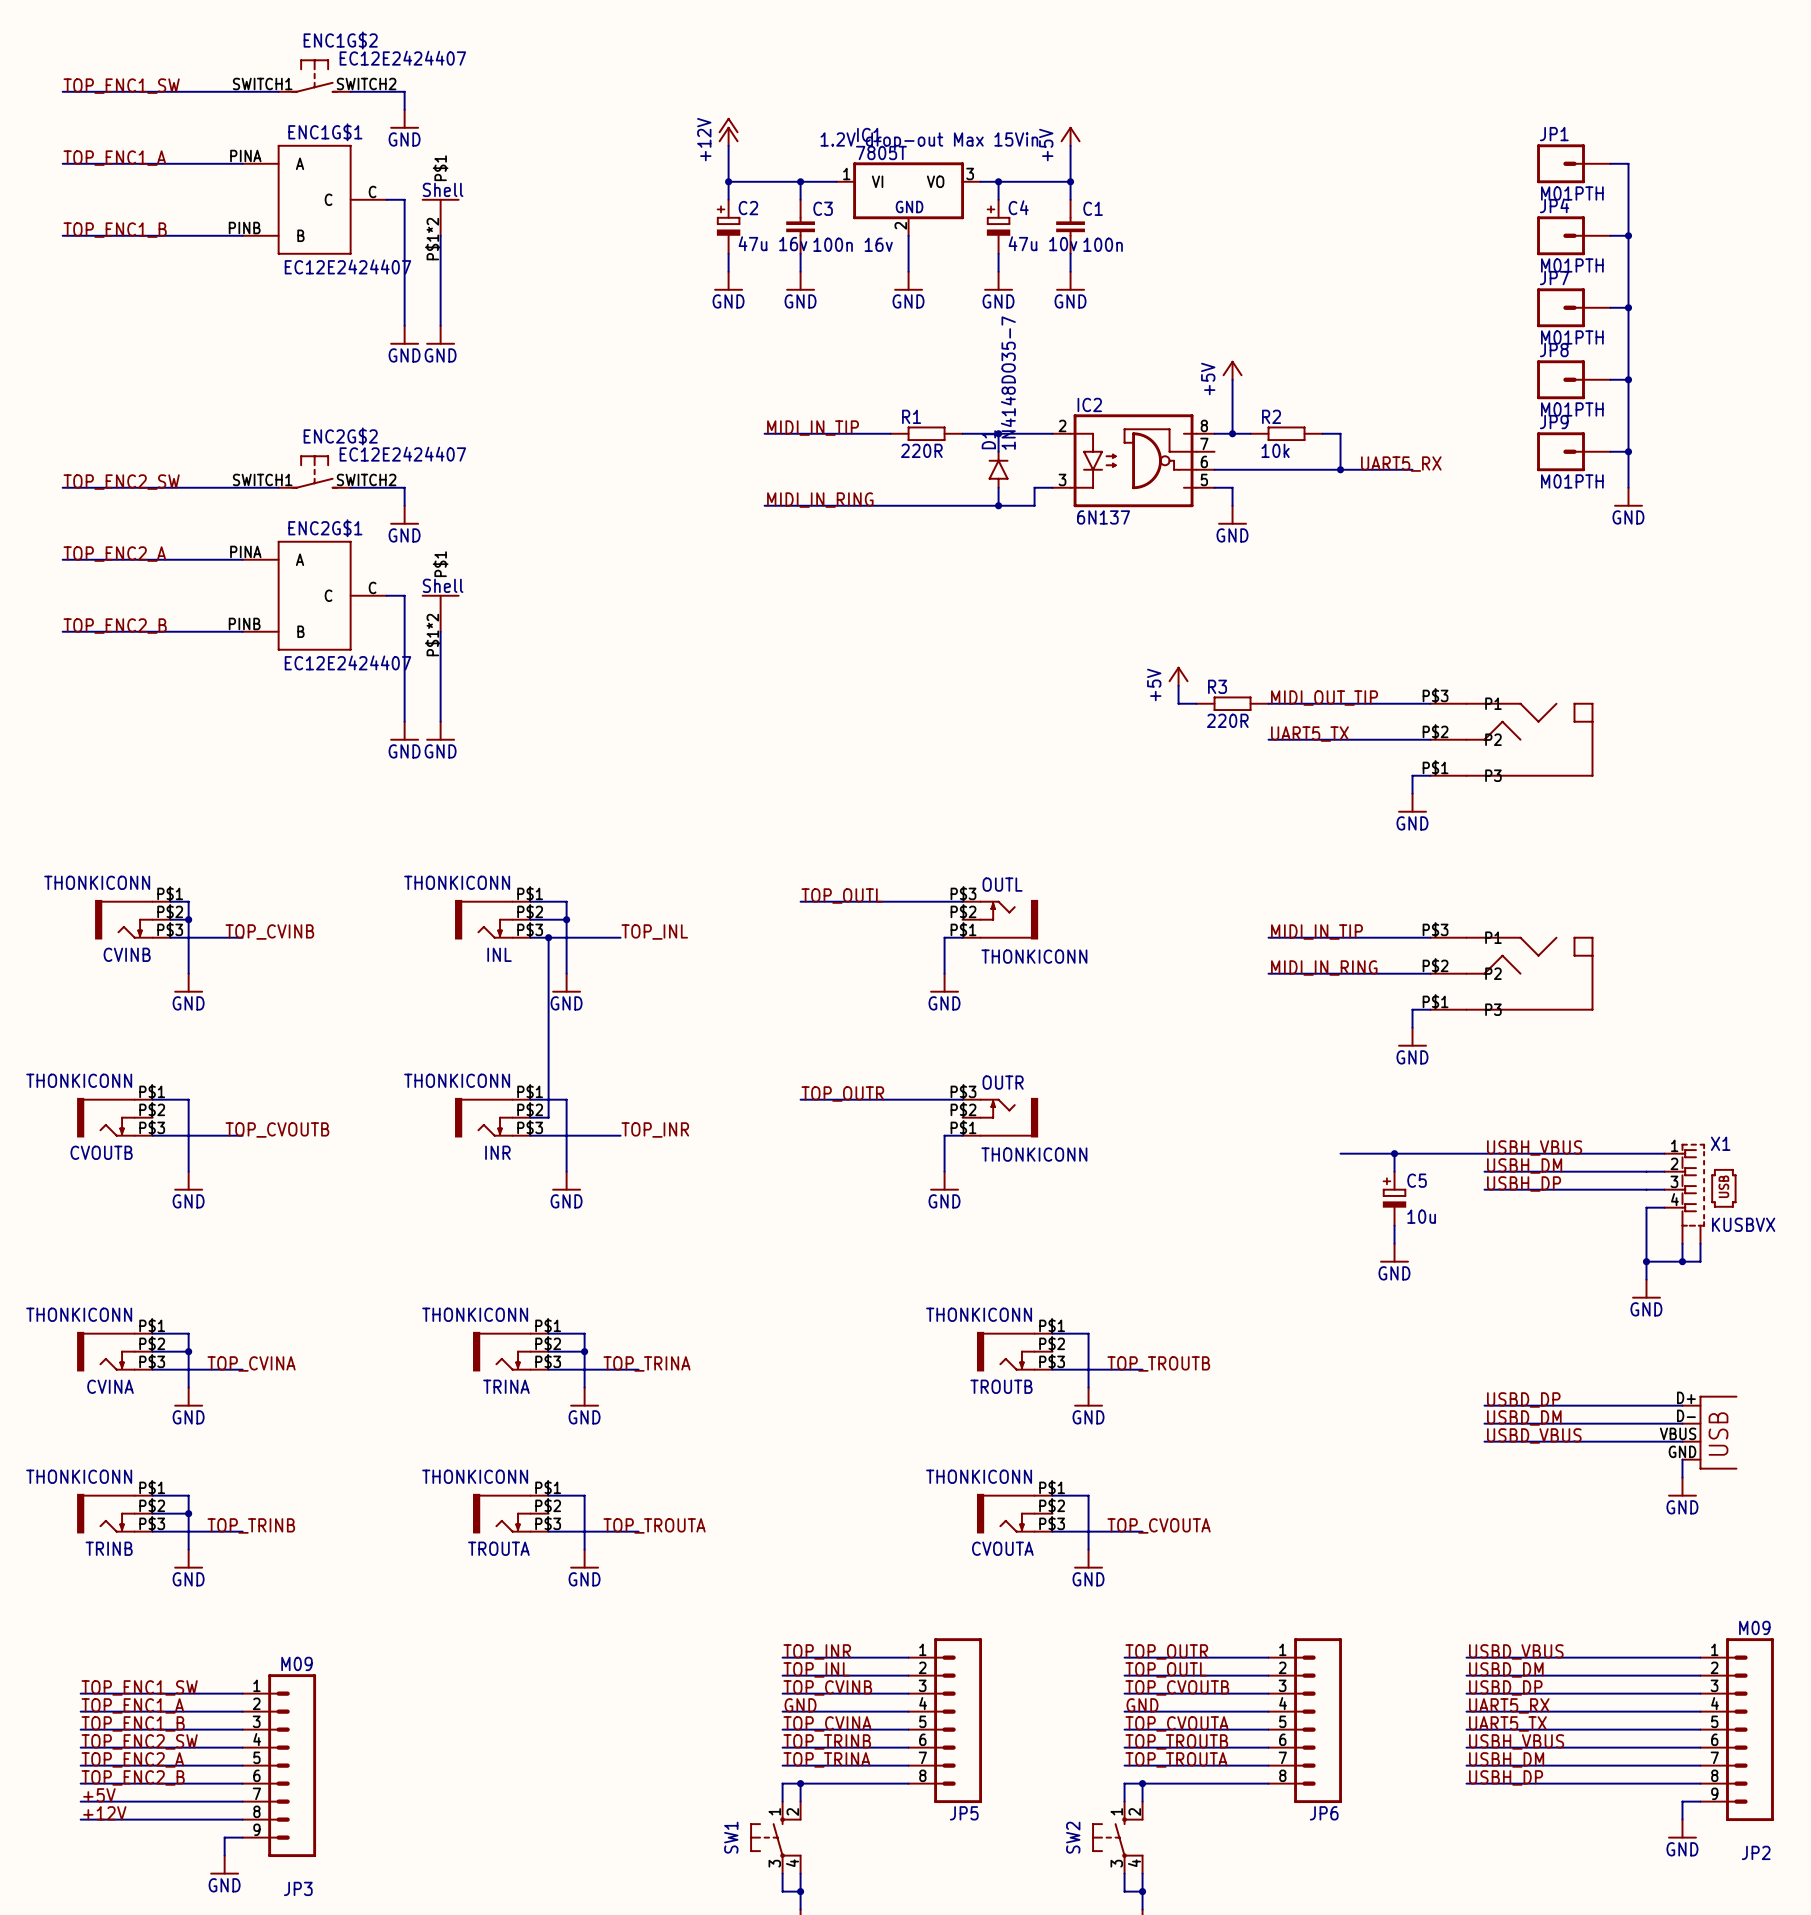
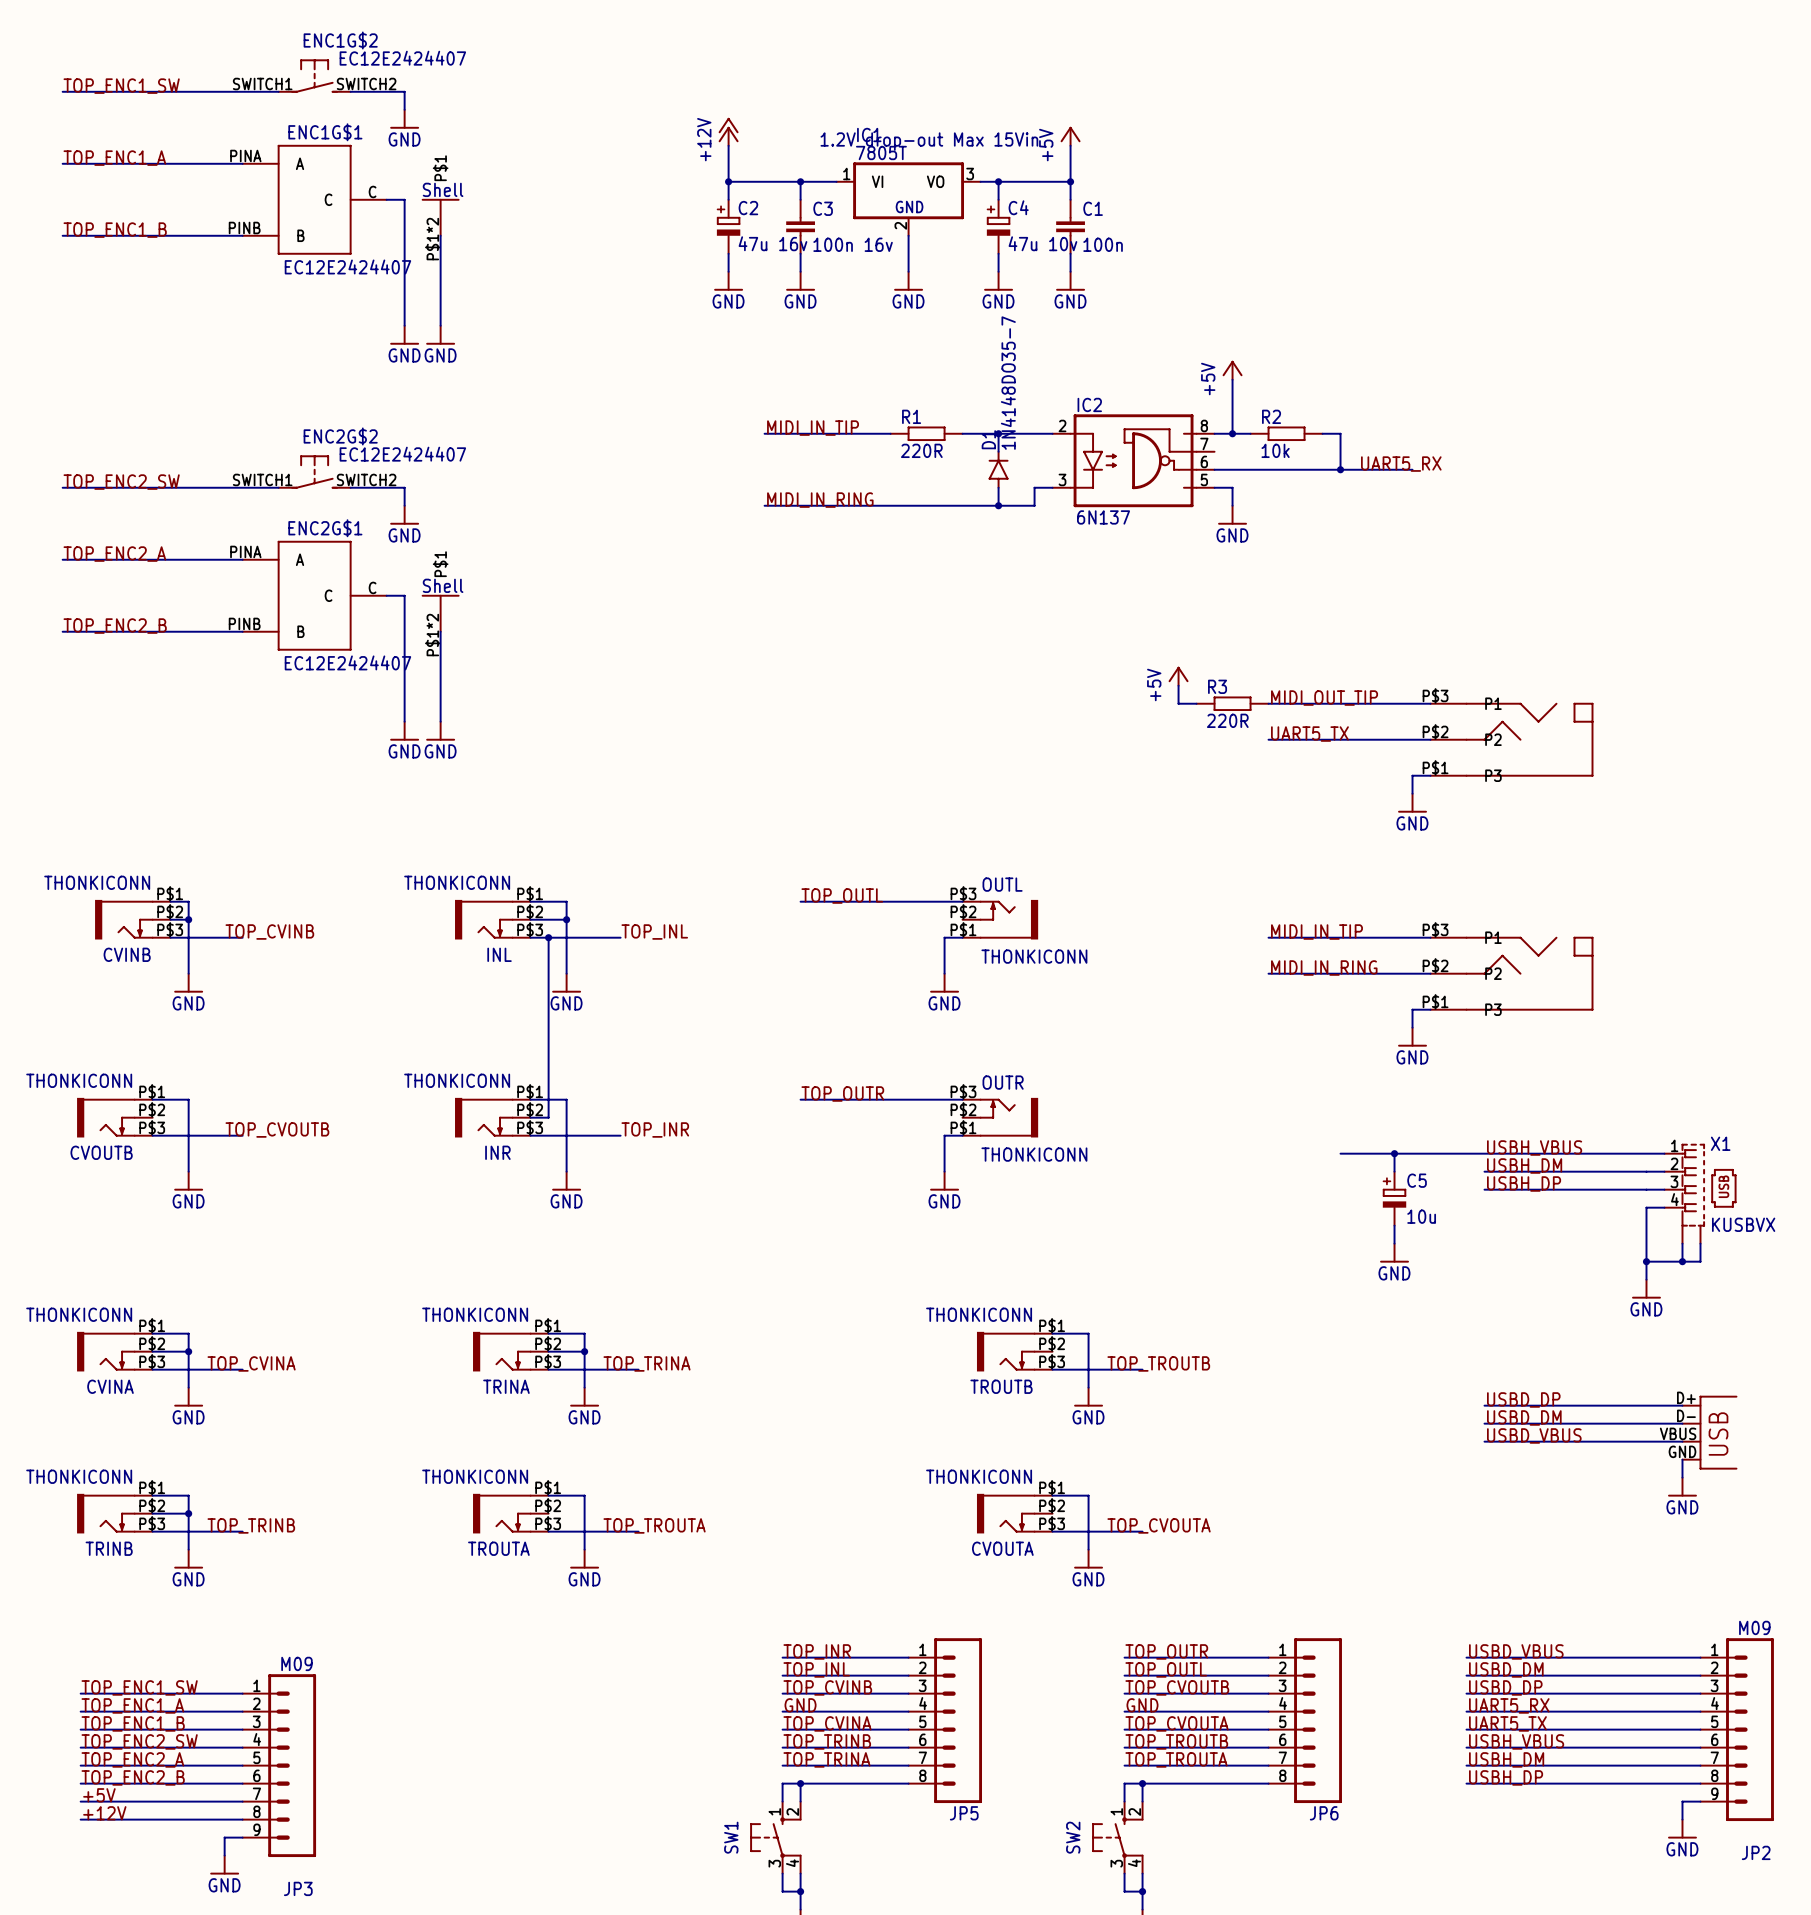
JP1: M01PTH (1573, 163) -> none
wire: (1610, 163) (1628, 163) (1628, 487) -> none
JP4: M01PTH (1573, 235) -> none
wire: (1610, 235) (1628, 235) -> none
junction: (1628, 235) -> none
JP7: M01PTH (1573, 307) -> none
wire: (1610, 307) (1628, 307) -> none
junction: (1628, 307) -> none
JP8: M01PTH (1573, 379) -> none
wire: (1610, 379) (1628, 379) -> none
junction: (1628, 379) -> none
JP9: M01PTH (1573, 451) -> none
wire: (1610, 451) (1628, 451) -> none
junction: (1628, 451) -> none
power symbol: GND (1628, 497) -> none

